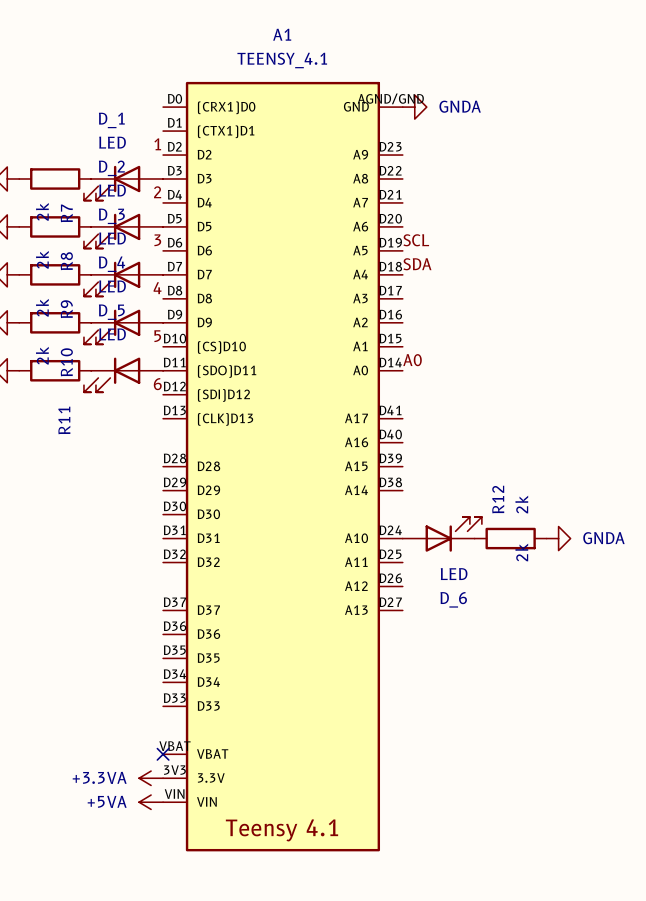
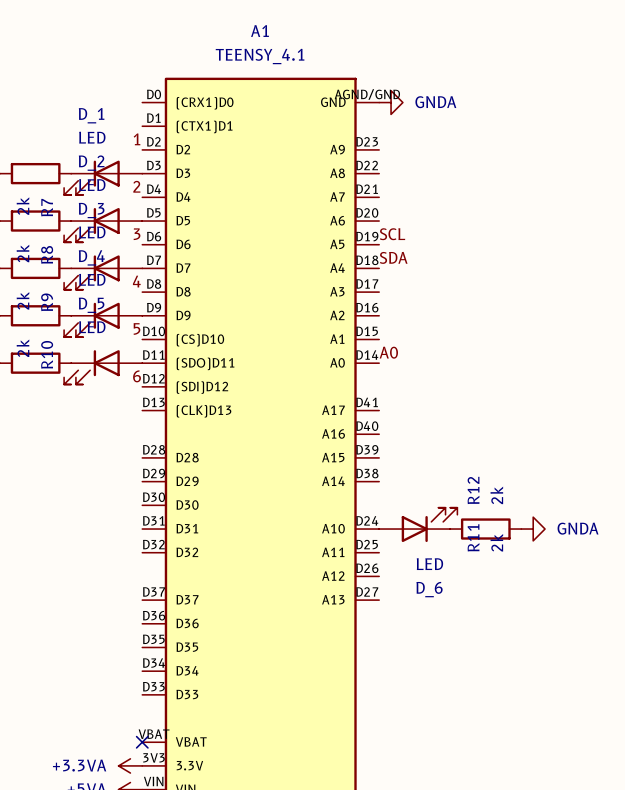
R11 name position: R11 (64, 420) -> R11 (473, 537)

